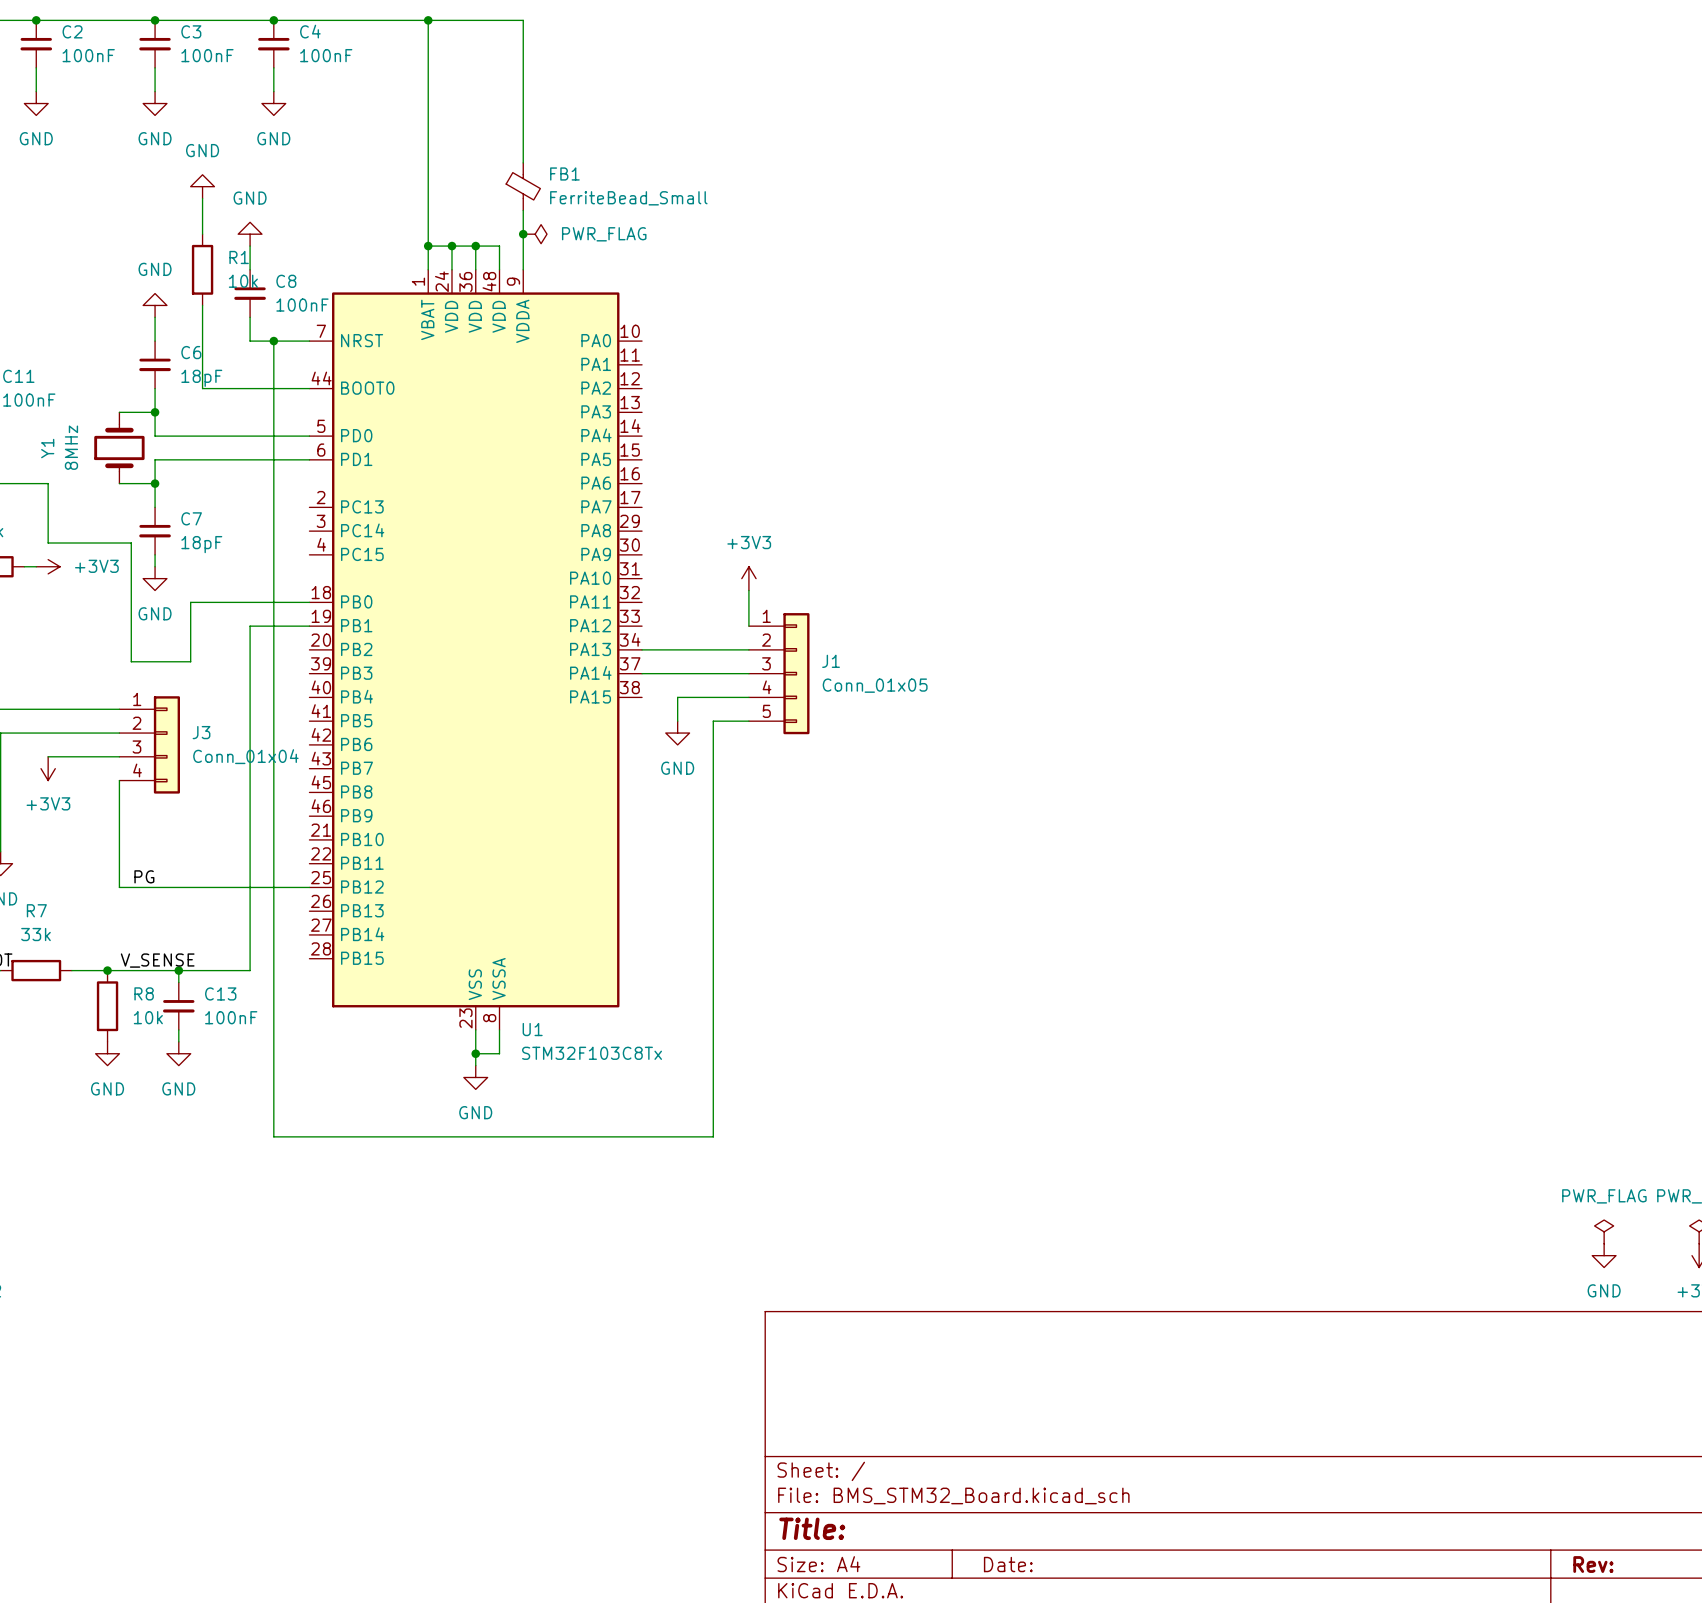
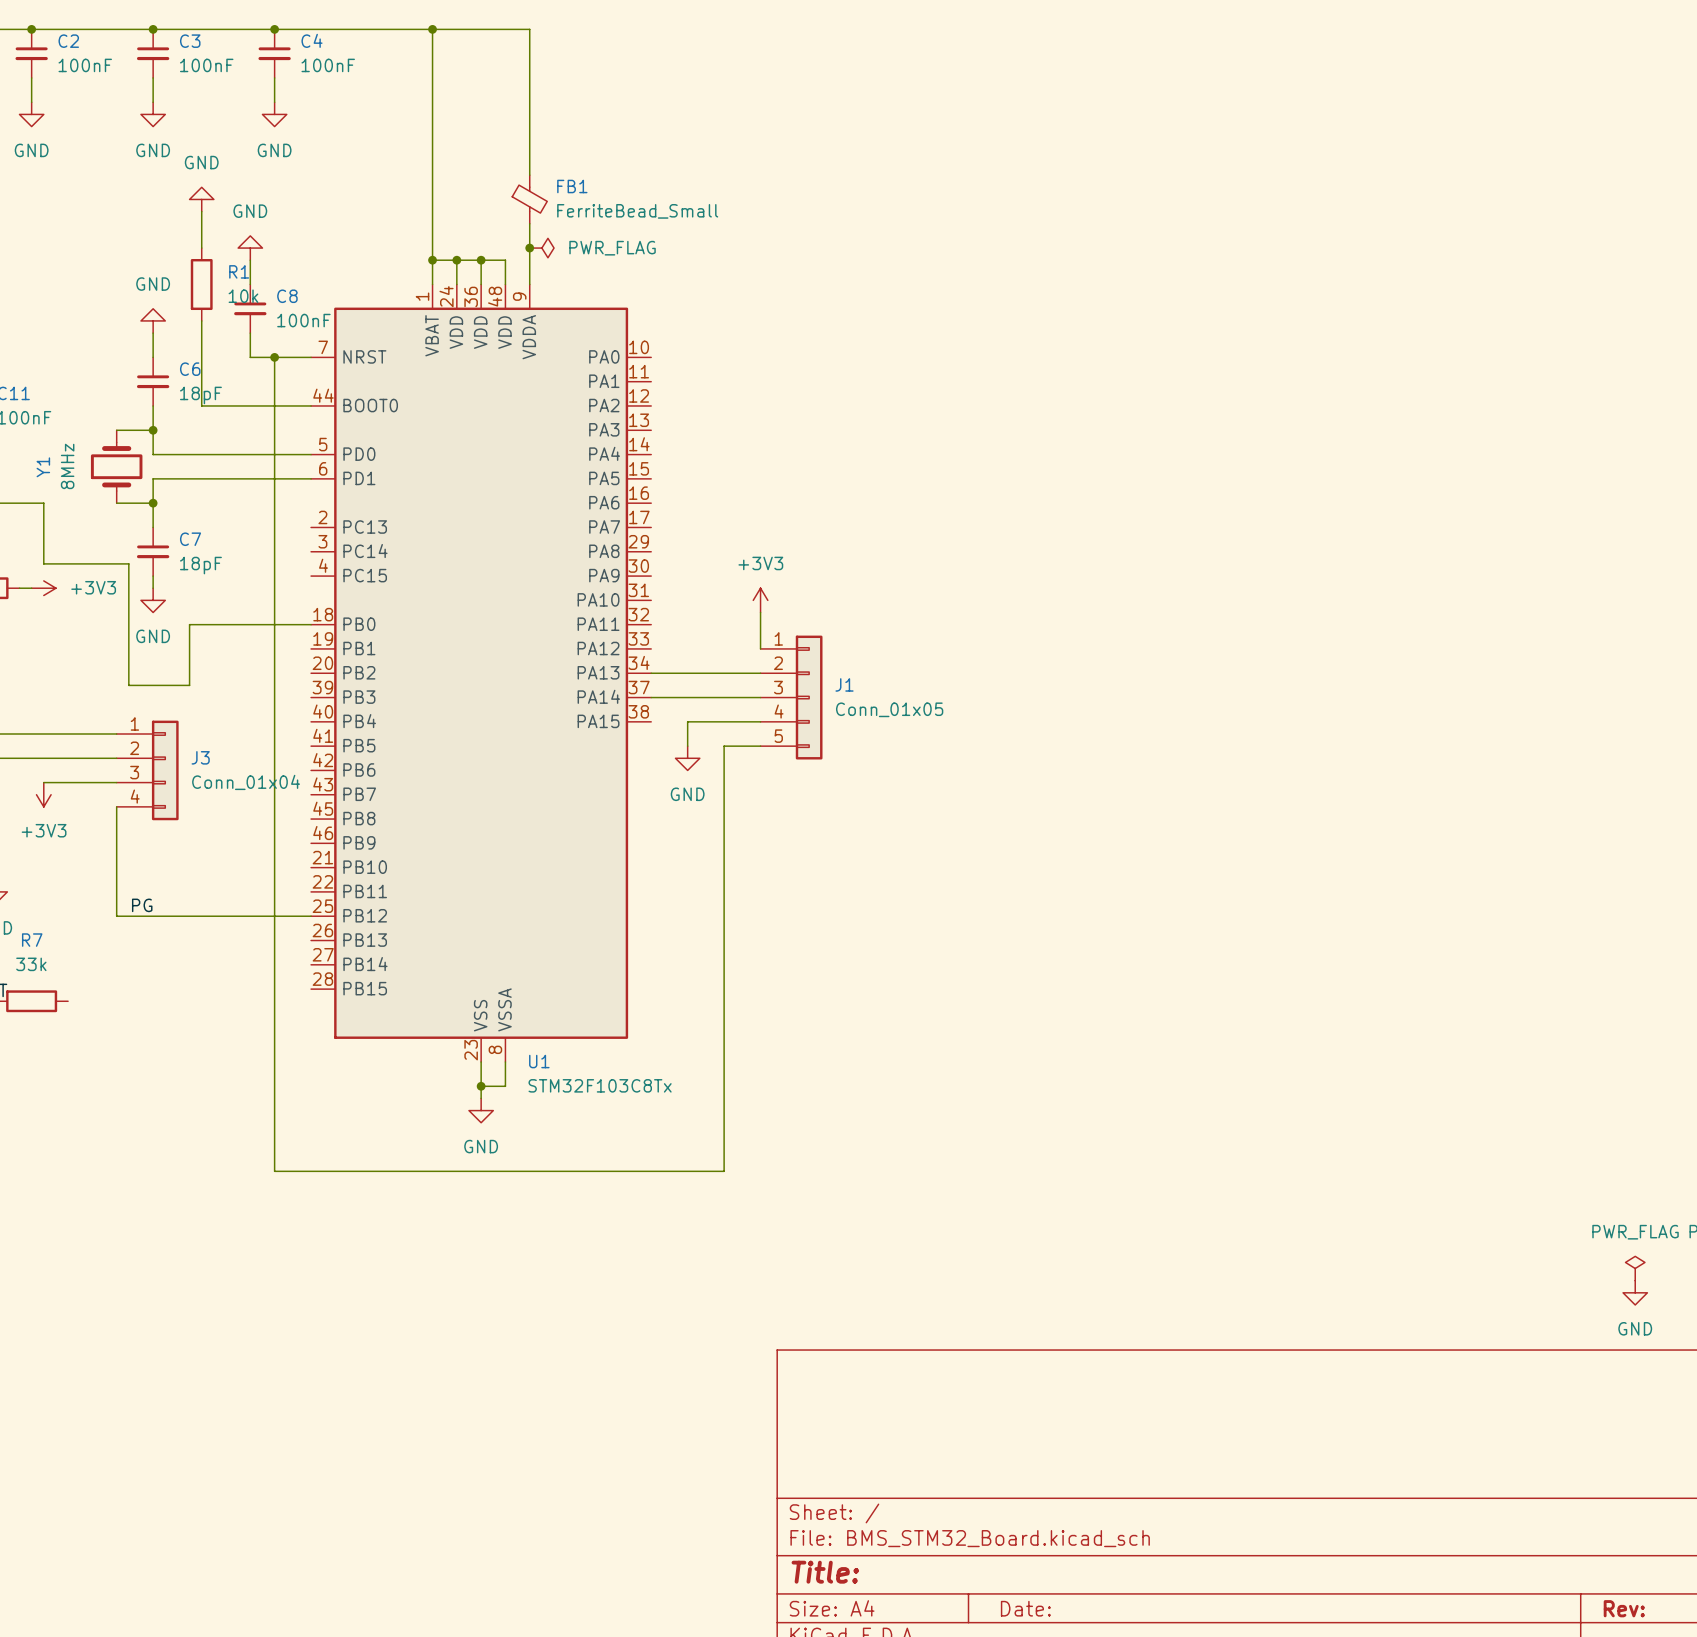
wire: (309, 626) (250, 626) (250, 970) (71, 970) -> none
label: V_SENSE (157, 960) -> none
junction: (107, 970) -> none
wire: (178, 970) (178, 982) -> none
junction: (178, 970) -> none
R8: 10k (107, 1006) -> none
C13: 100nF (178, 1006) -> none
wire: (178, 1029) (178, 1041) -> none
power symbol: GND (107, 1053) -> none
power symbol: GND (178, 1053) -> none

